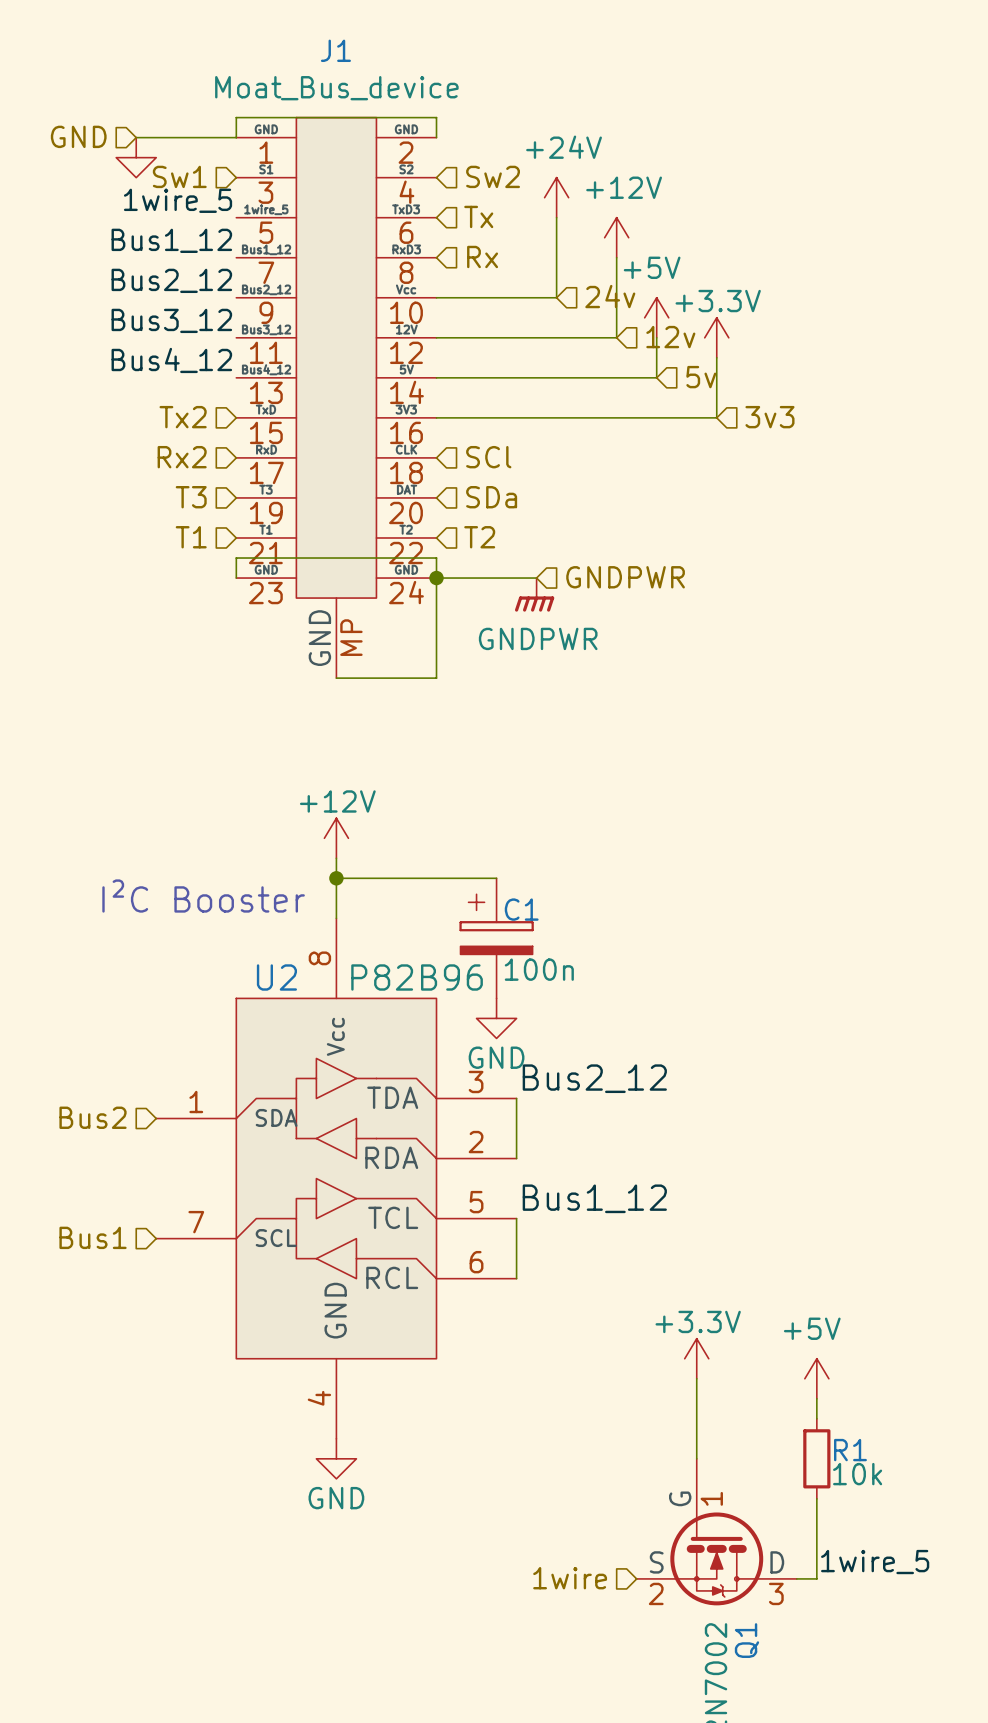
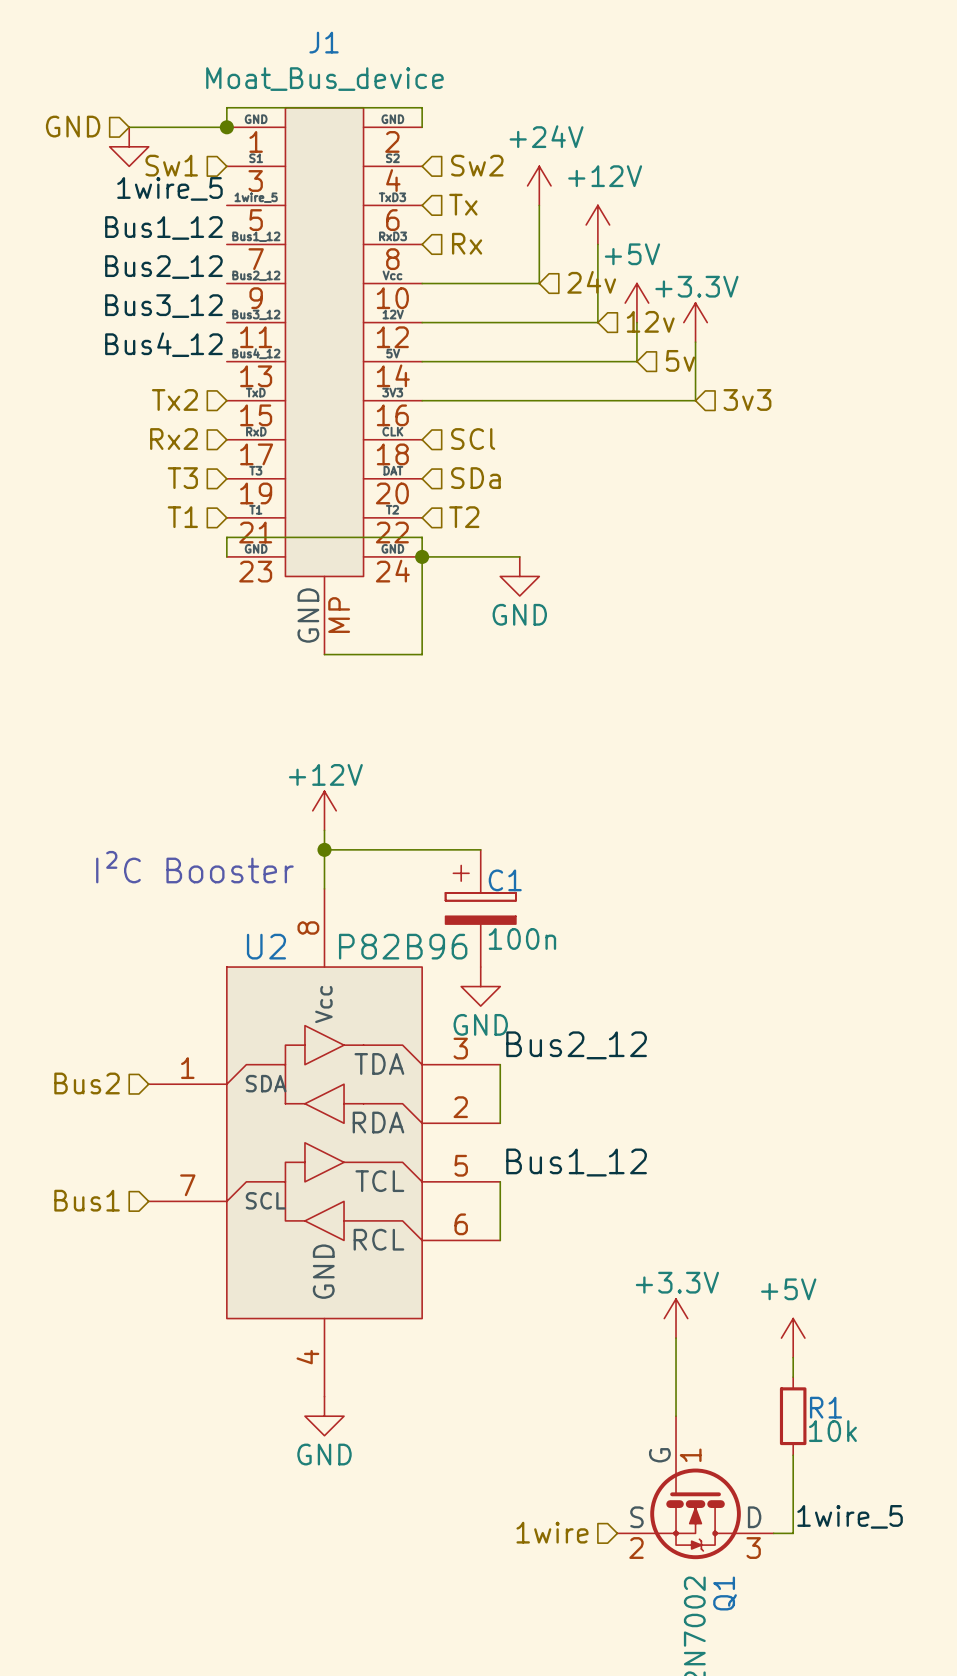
junction: none -> (226, 127)
hierarchical label: GNDPWR (625, 577) -> none
power symbol: GNDPWR (534, 594) -> GND (519, 576)

